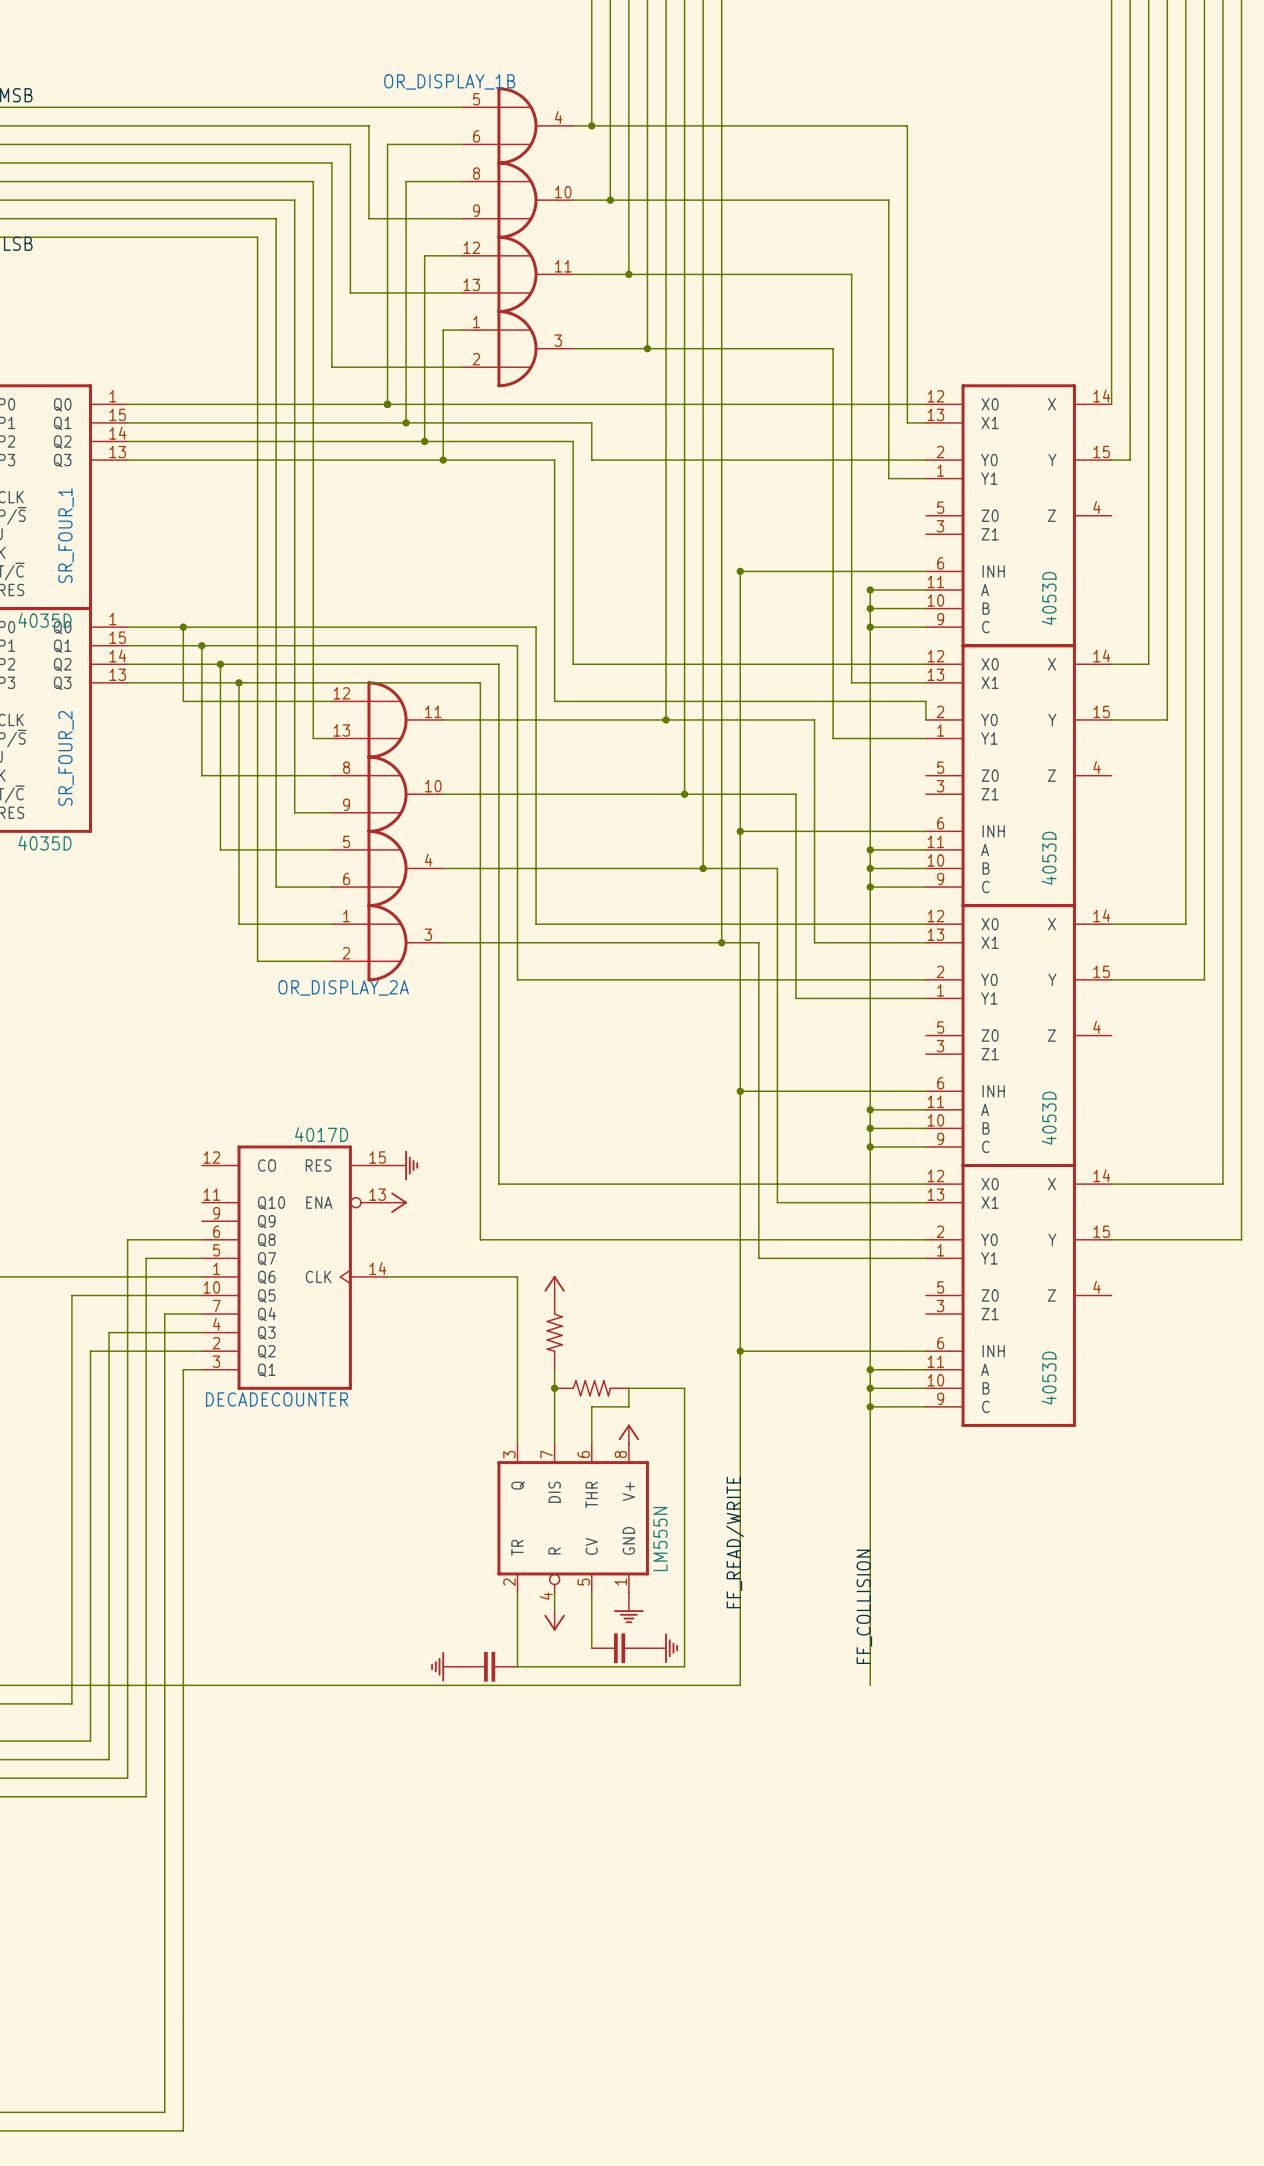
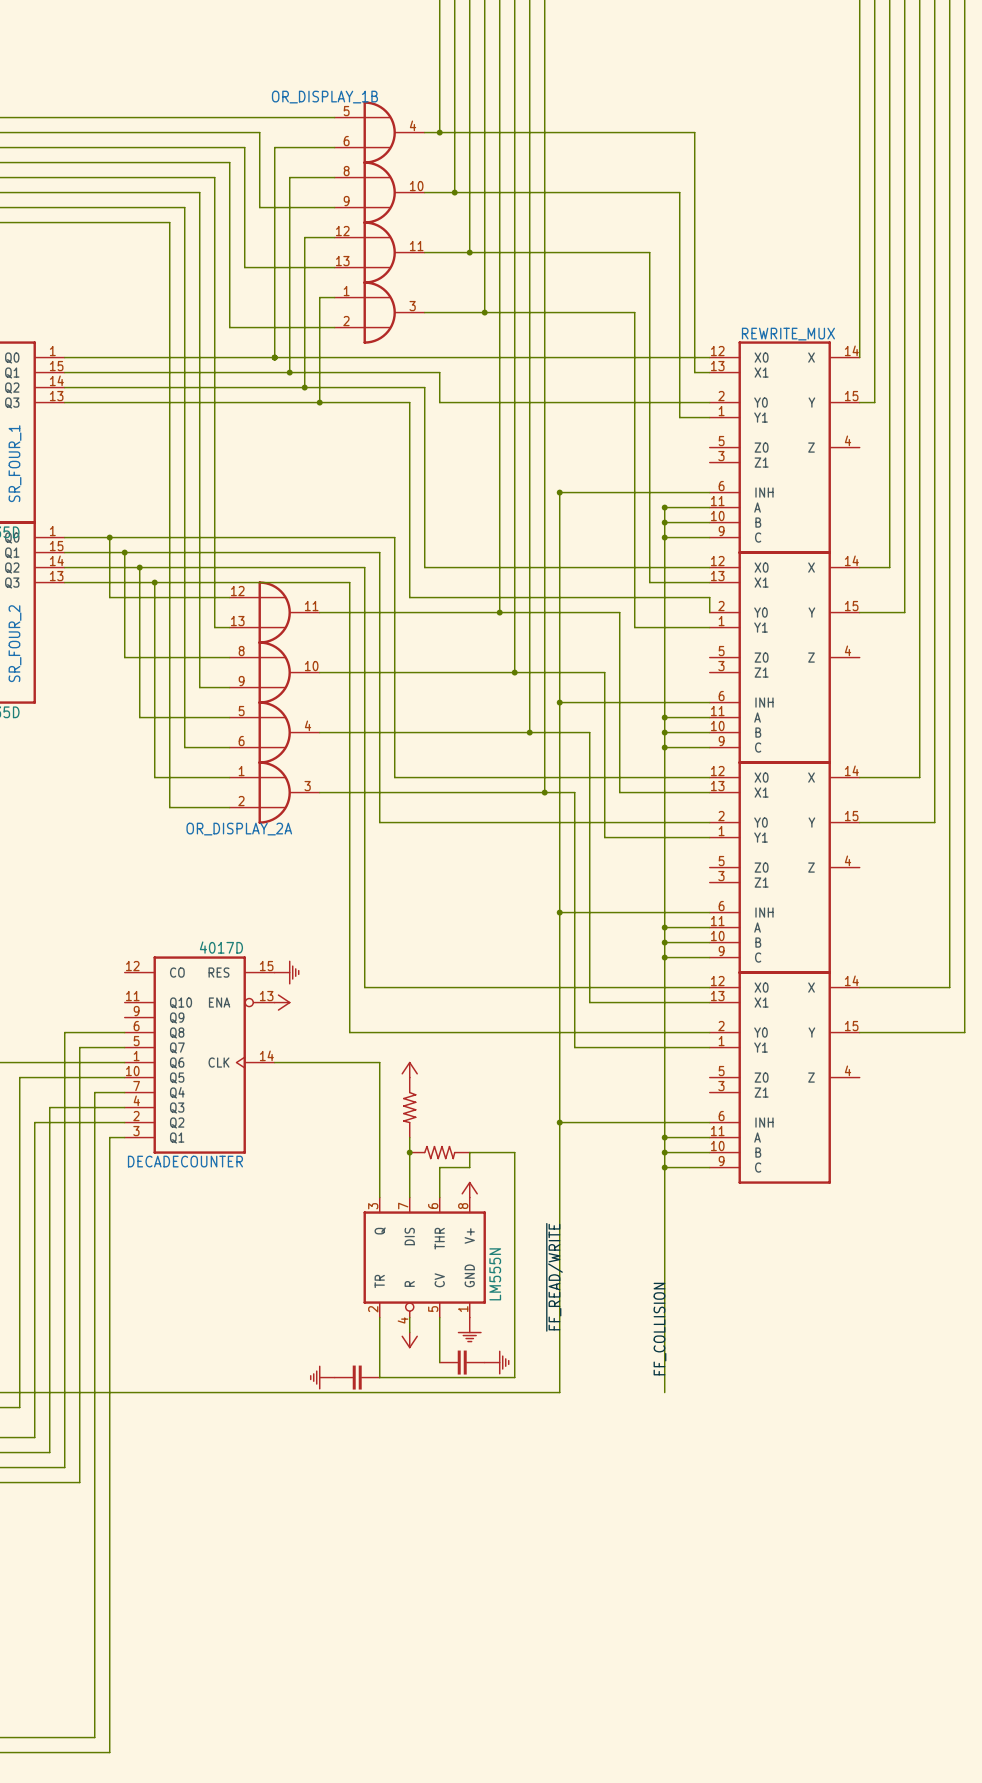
REWRITE_MUX name: none -> REWRITE_MUX (788, 334)
REWRITE_MUX value: 4053D (1049, 598) -> none
part value: 4053D (1049, 858) -> none
part value: 4053D (1049, 1118) -> none
part value: 4053D (1049, 1378) -> none
label: FF_READ/WRITE (735, 1542) -> ~{FF_READ/WRITE} (554, 1277)

